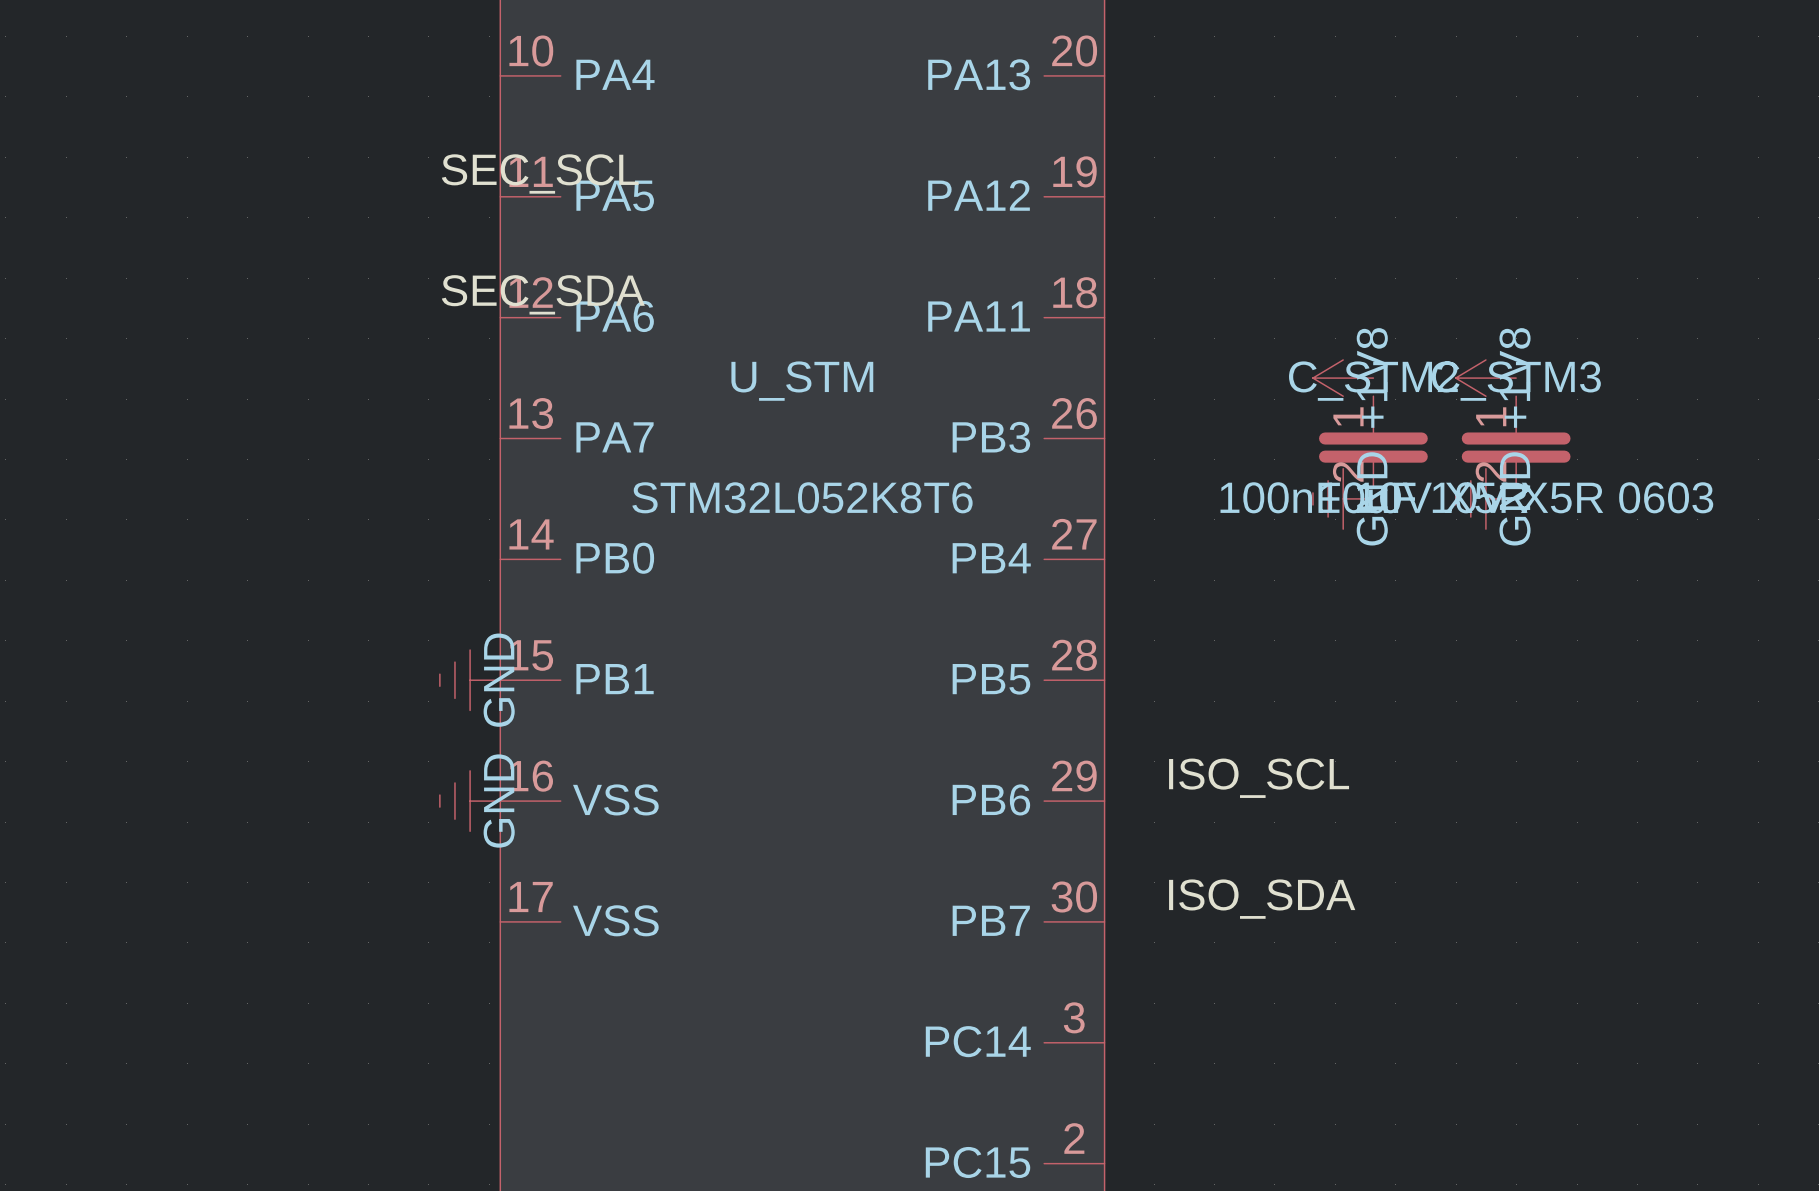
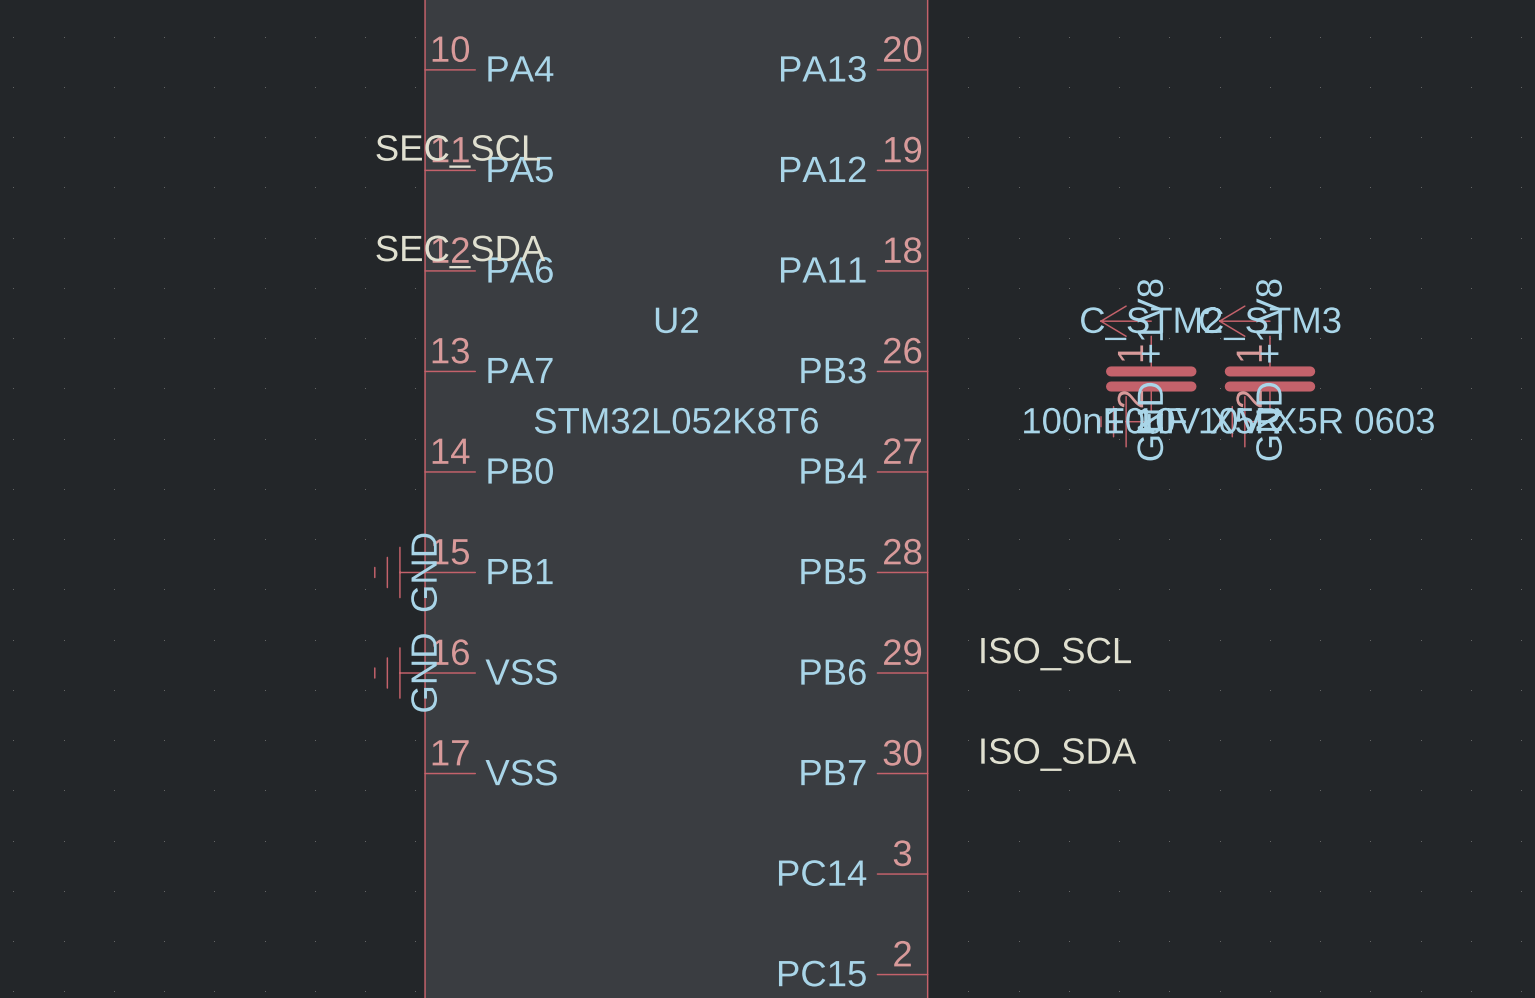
U_STM name: U_STM (802, 381) -> U2 (676, 320)

